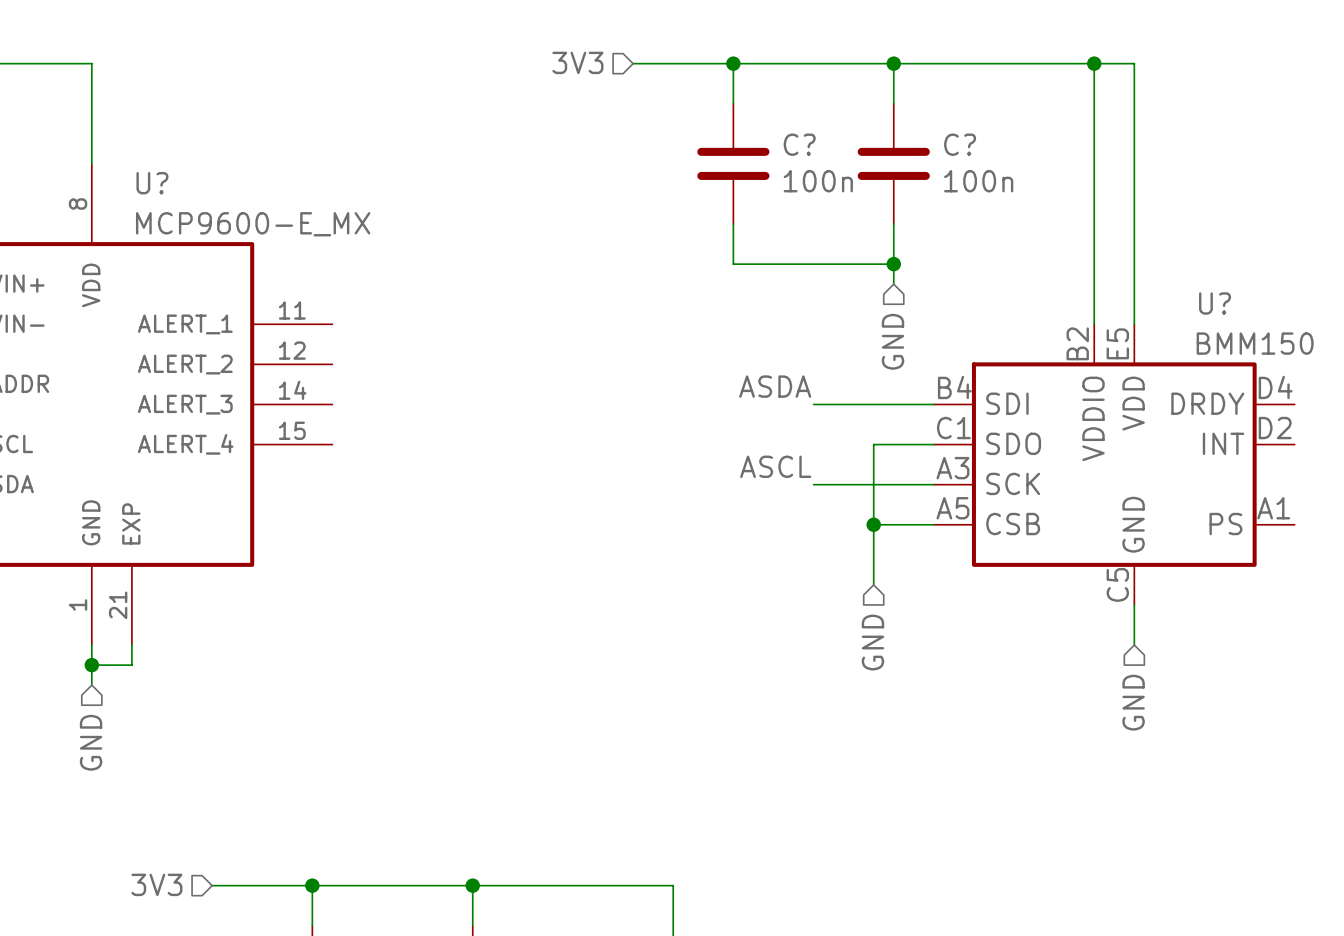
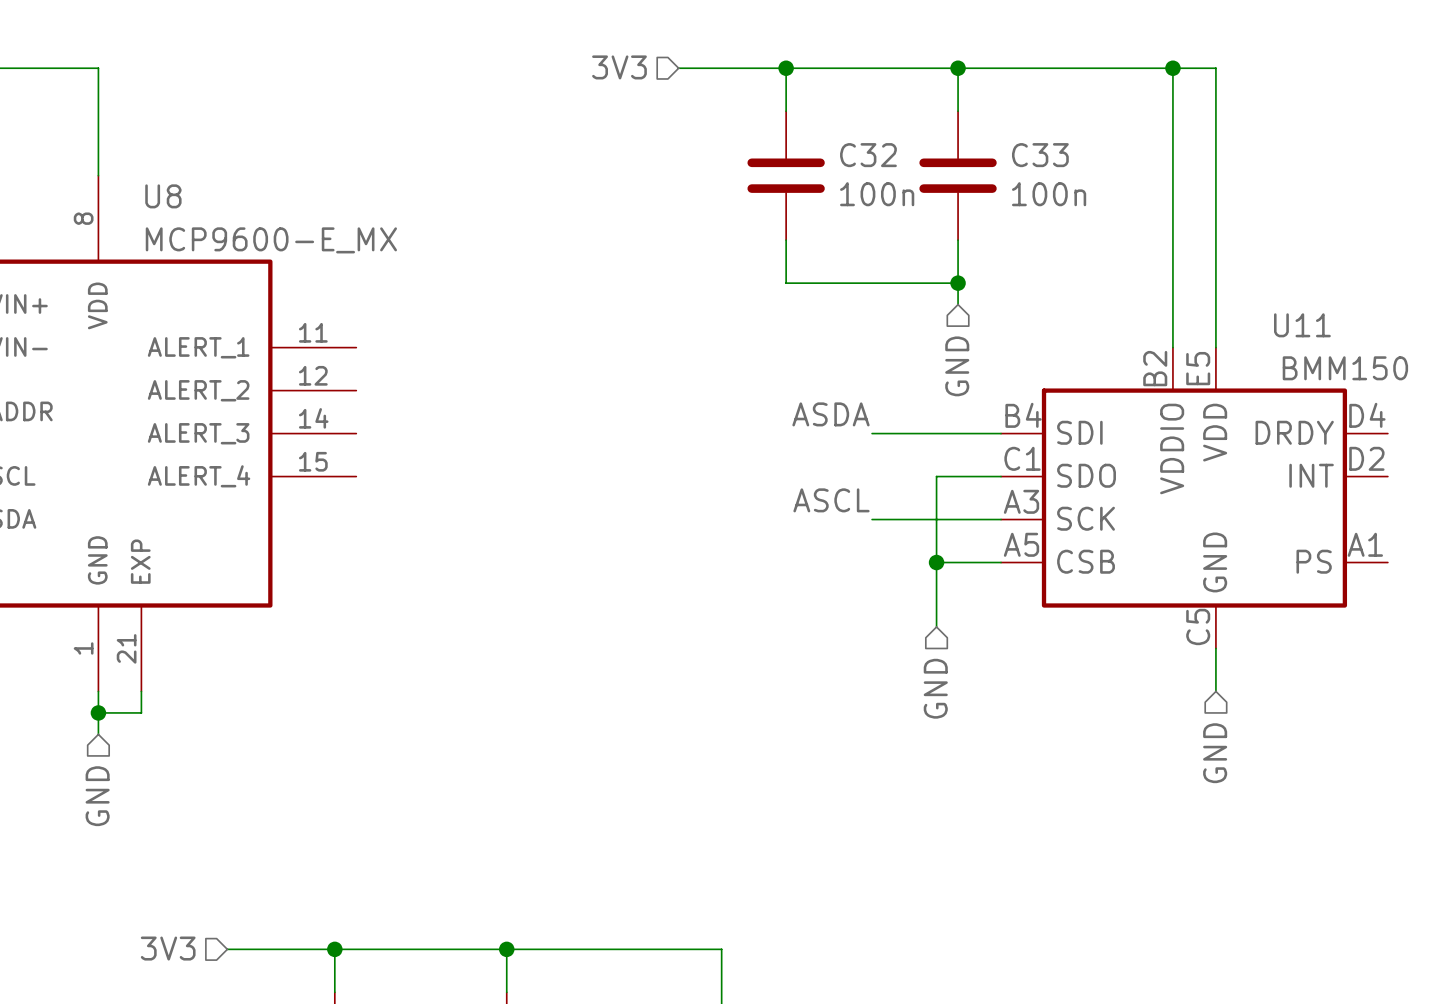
C? name: C? (799, 144) -> C32 (868, 155)
C? name: C? (960, 144) -> C33 (1040, 155)
U? name: U? (152, 183) -> U8 (163, 196)
U? name: U? (1215, 303) -> U11 (1302, 325)

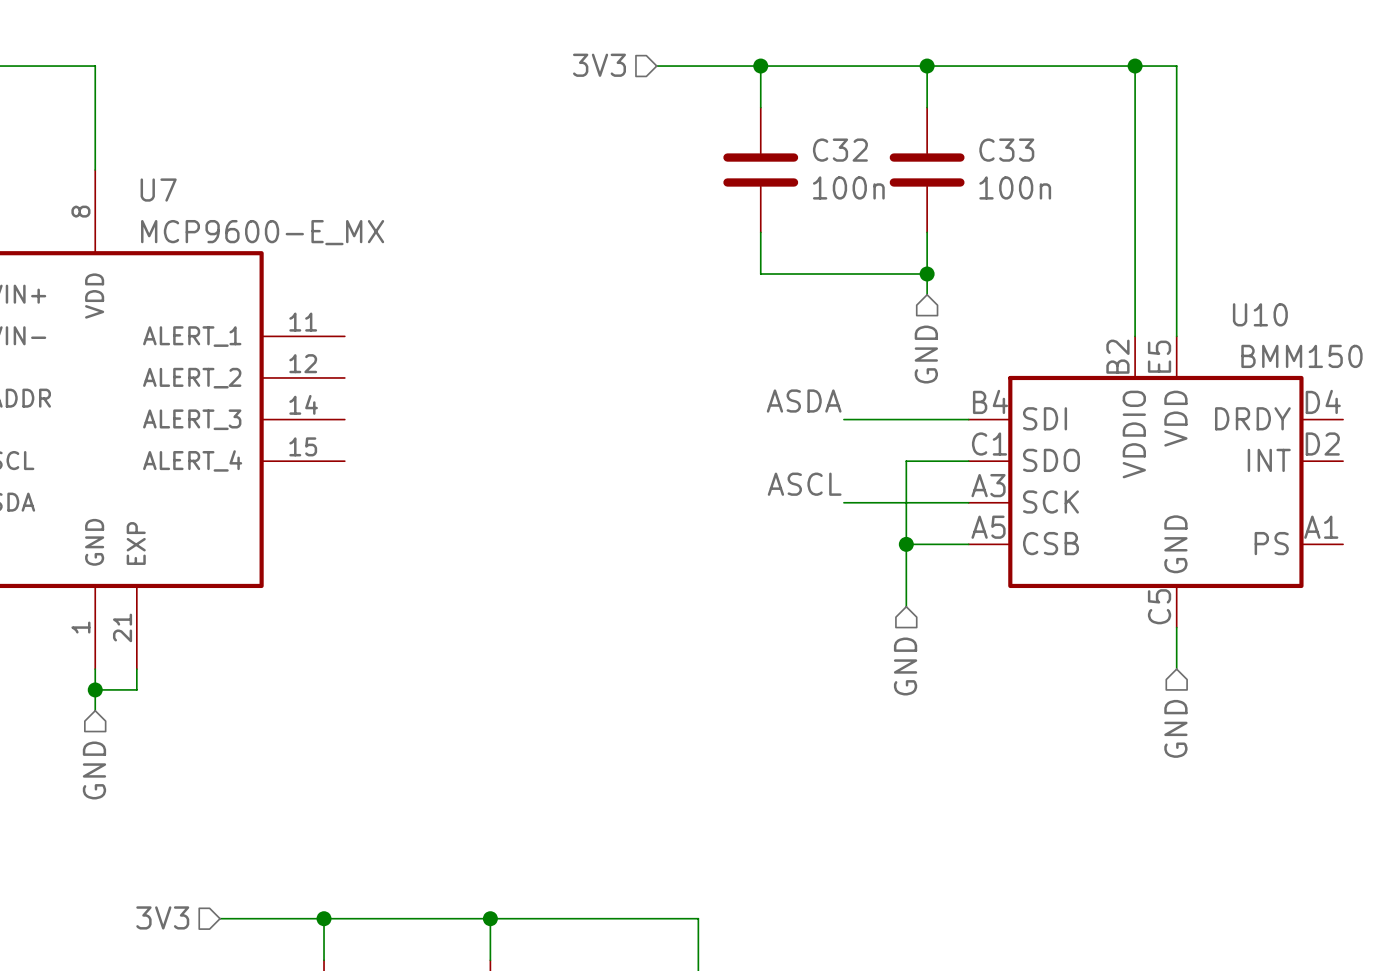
U8 name: U8 (163, 196) -> U7 (158, 190)
U11 name: U11 (1302, 325) -> U10 (1260, 314)

